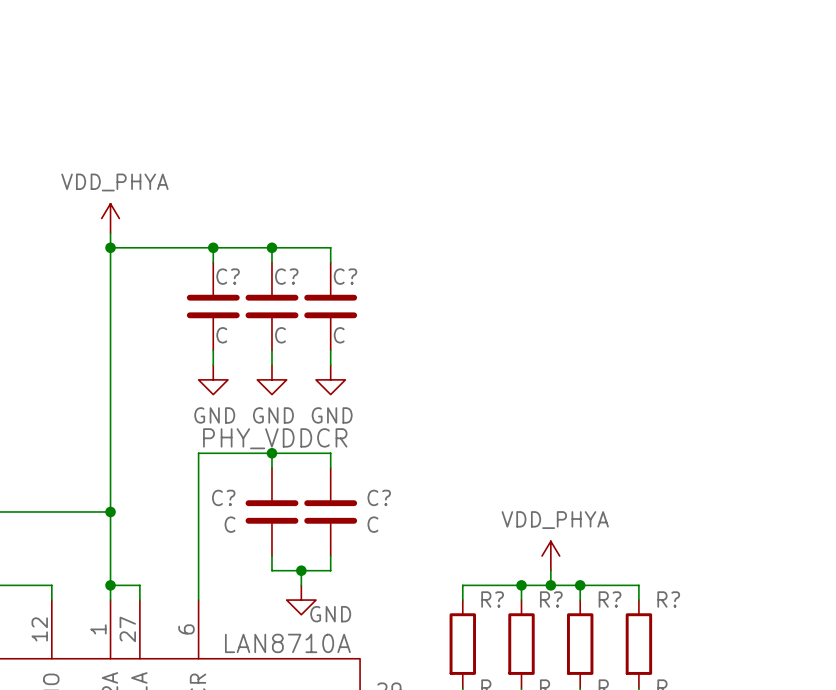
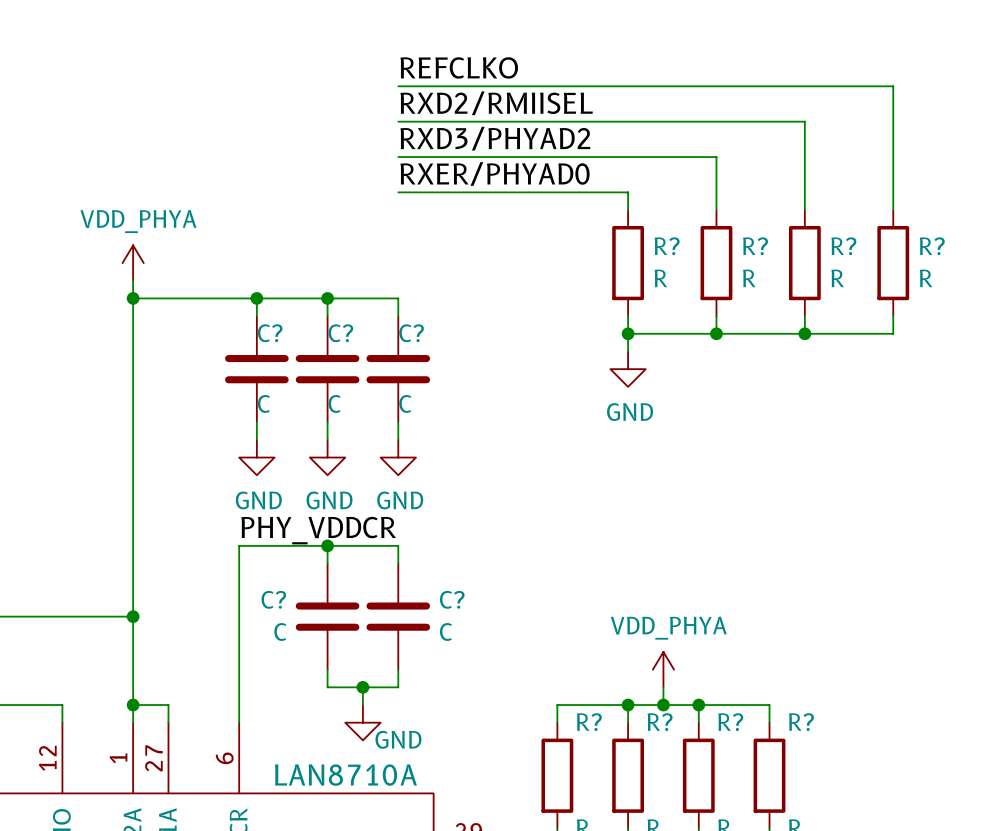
label: none -> REFCLKO (459, 67)
wire: none -> (398, 86) (893, 86) (893, 210)
label: none -> RXD2/RMIISEL (496, 103)
wire: none -> (398, 121) (804, 121) (804, 210)
label: none -> RXD3/PHYAD2 (495, 138)
wire: none -> (398, 157) (716, 157) (716, 210)
label: none -> RXER/PHYAD0 (495, 174)
wire: none -> (398, 192) (628, 192) (628, 210)
R?: none -> R (628, 263)
R?: none -> R (716, 263)
R?: none -> R (804, 263)
R?: none -> R (893, 263)
wire: none -> (628, 316) (628, 351)
wire: none -> (716, 316) (716, 333)
wire: none -> (804, 316) (804, 333)
wire: none -> (893, 316) (893, 333) (628, 333)
junction: none -> (628, 333)
junction: none -> (716, 333)
junction: none -> (804, 333)
power symbol: none -> GND (628, 369)

